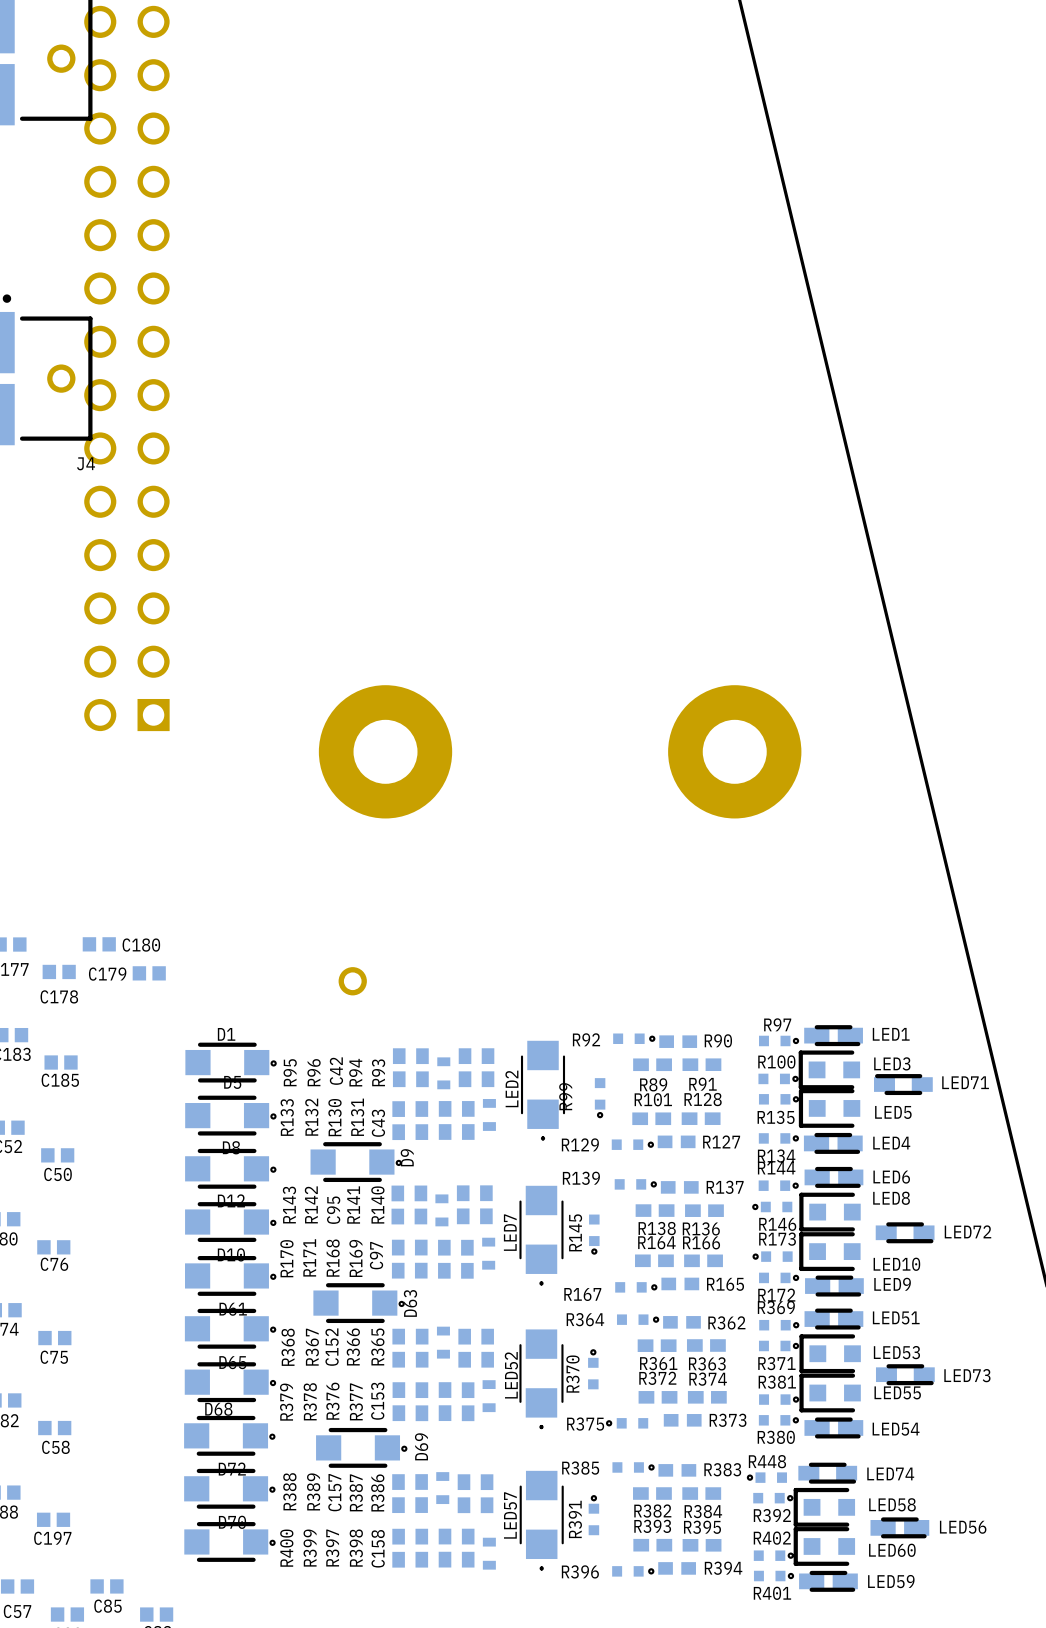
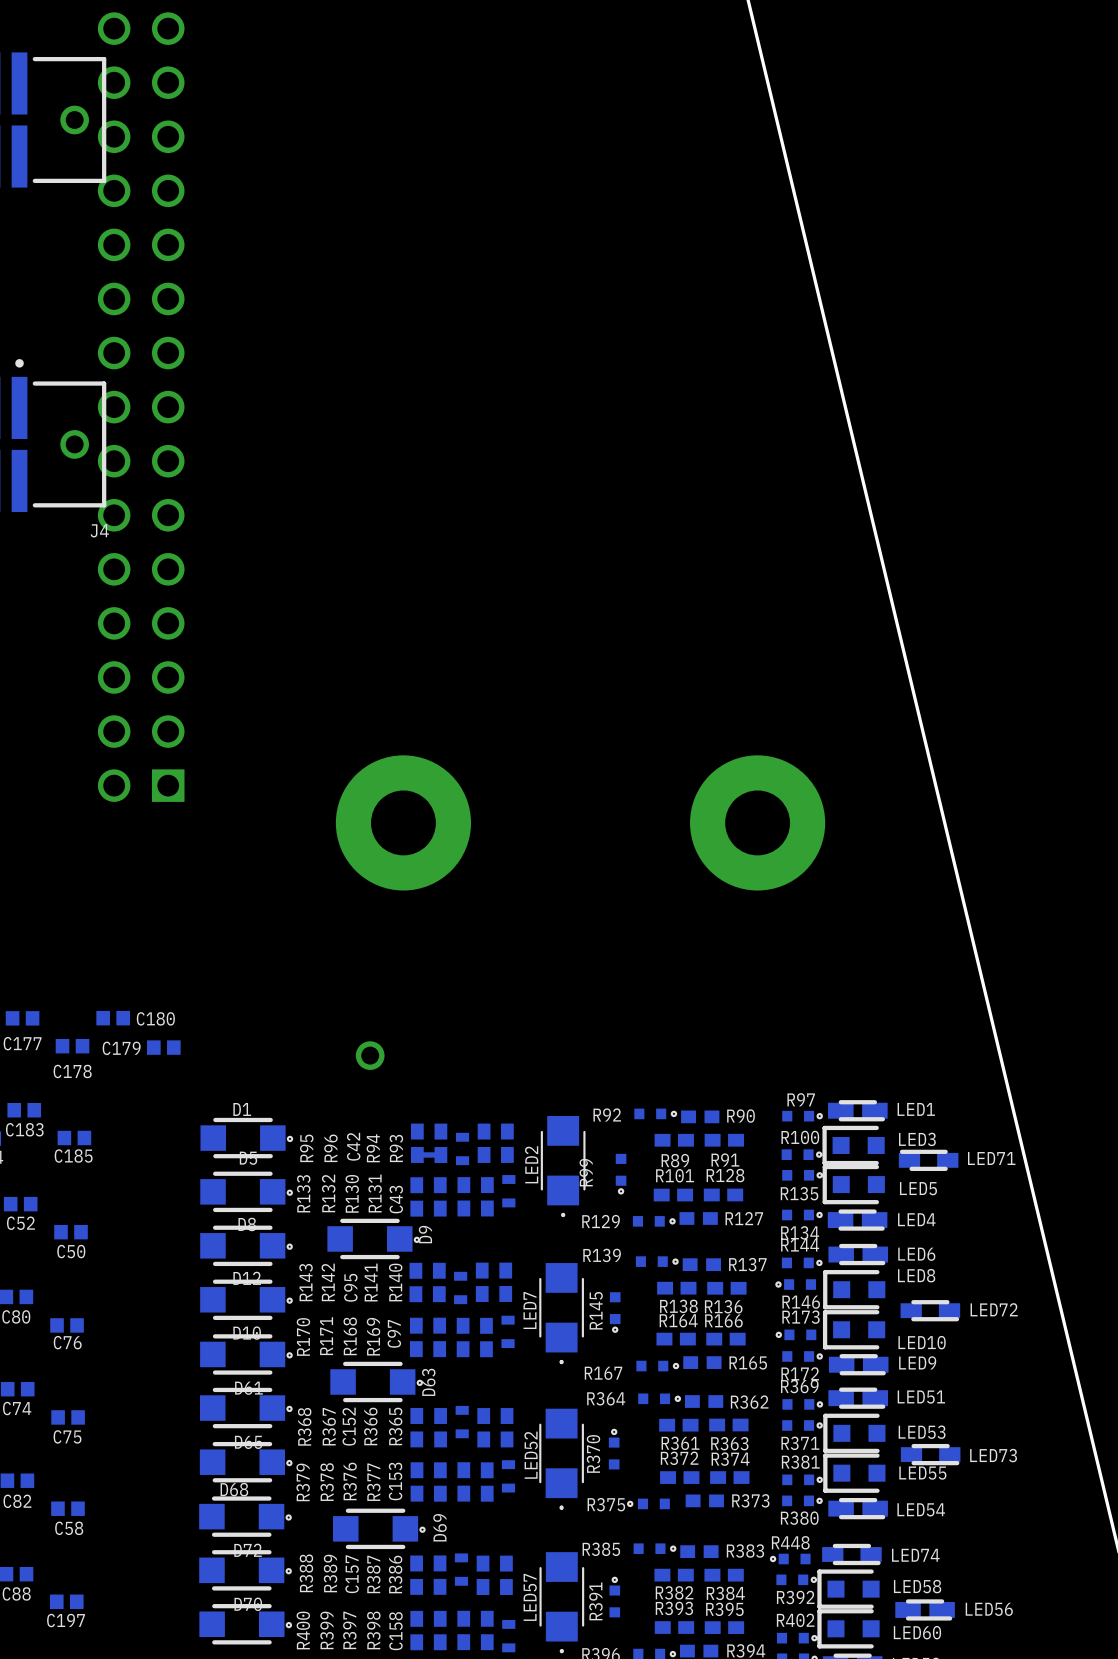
track: none -> (440, 1154) (417, 1154)

